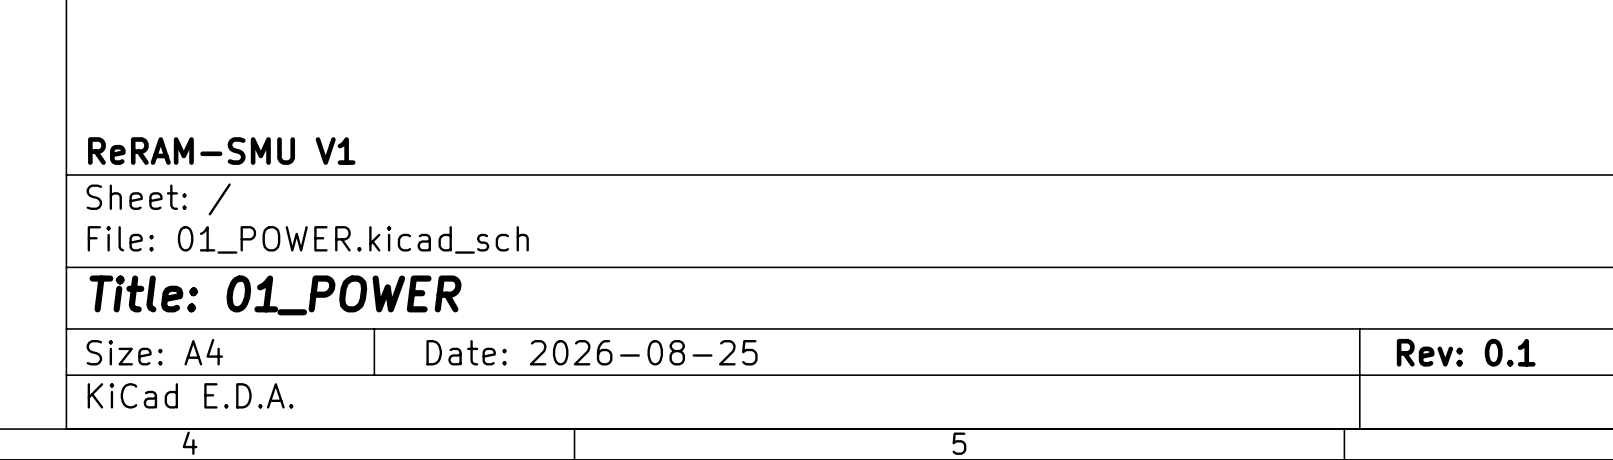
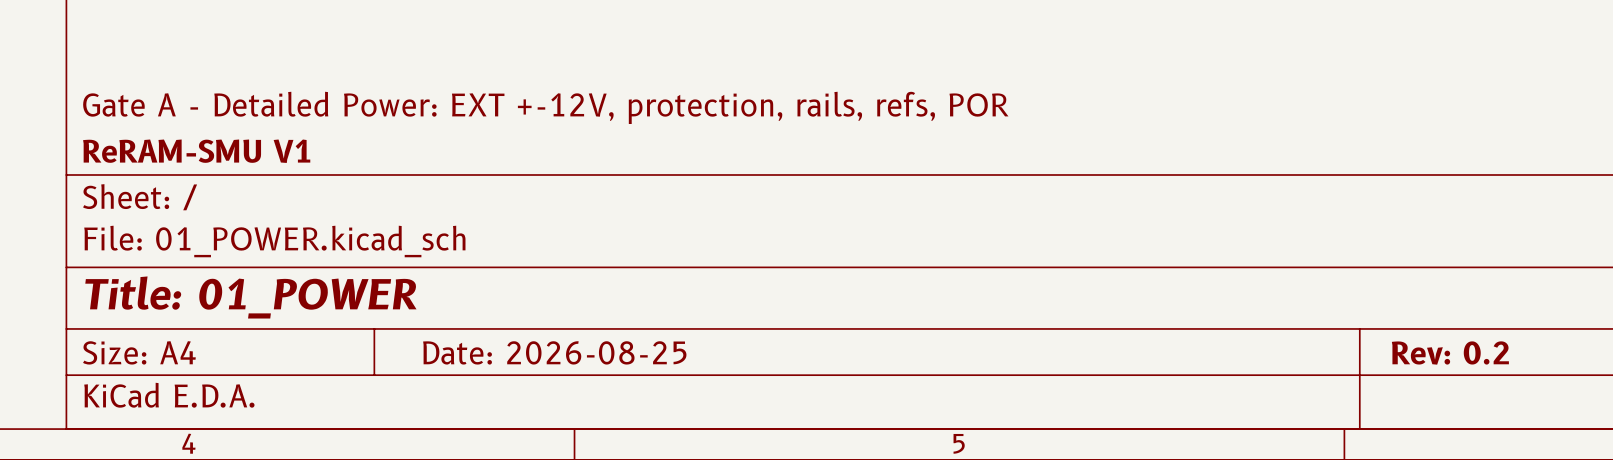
title block: none -> Gate A - Detailed Power: EXT +-12V, protection, rails, refs, POR (545, 107)
title block: Rev: 0.1 (1466, 352) -> Rev: 0.2 (1450, 353)

